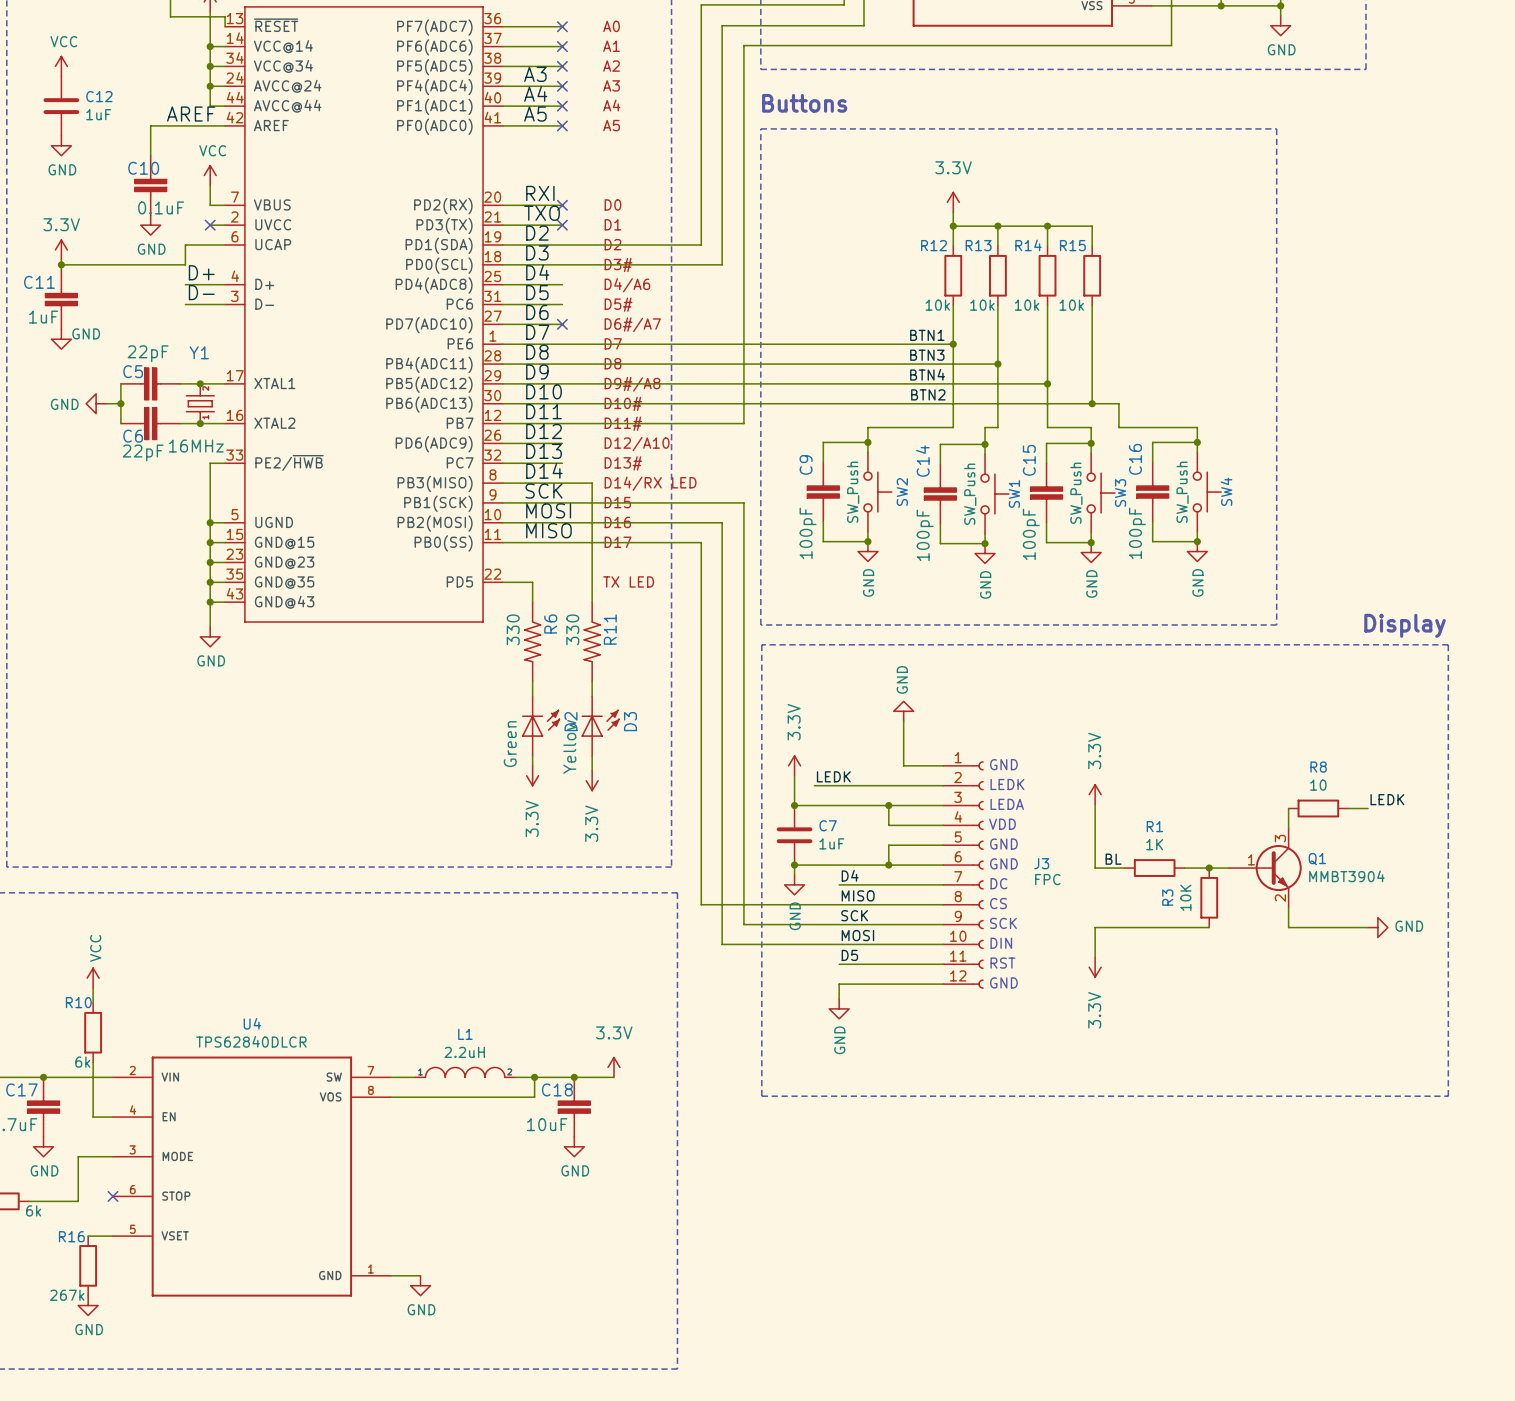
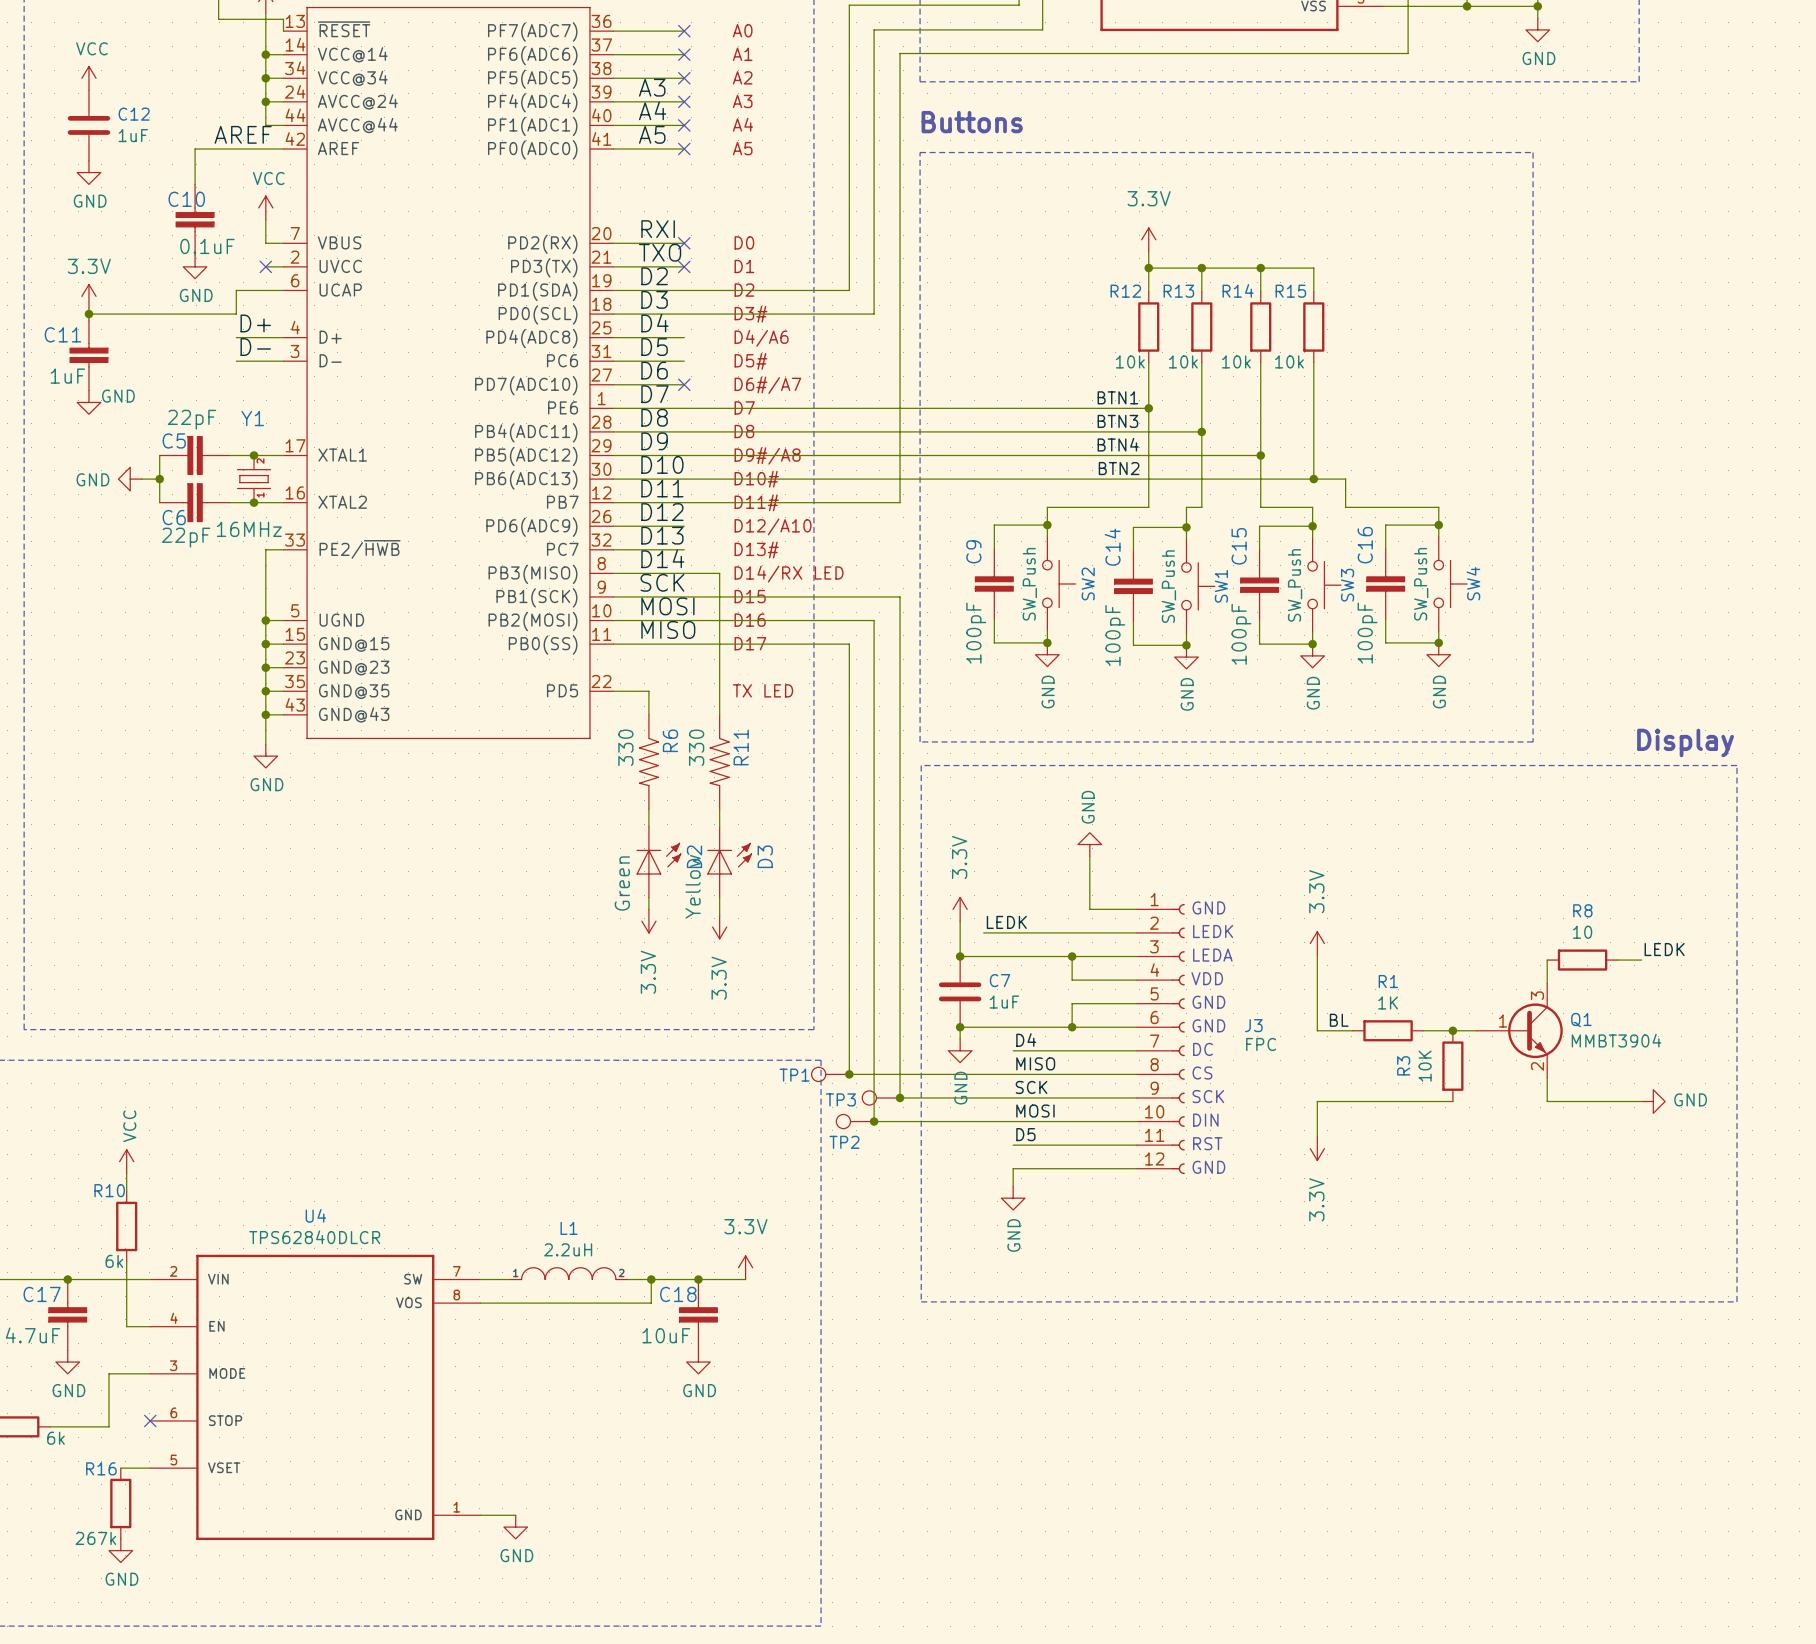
TP1: none -> (830, 1074)
junction: none -> (849, 1074)
TP3: none -> (881, 1097)
junction: none -> (900, 1097)
TP2: none -> (855, 1121)
junction: none -> (874, 1121)

